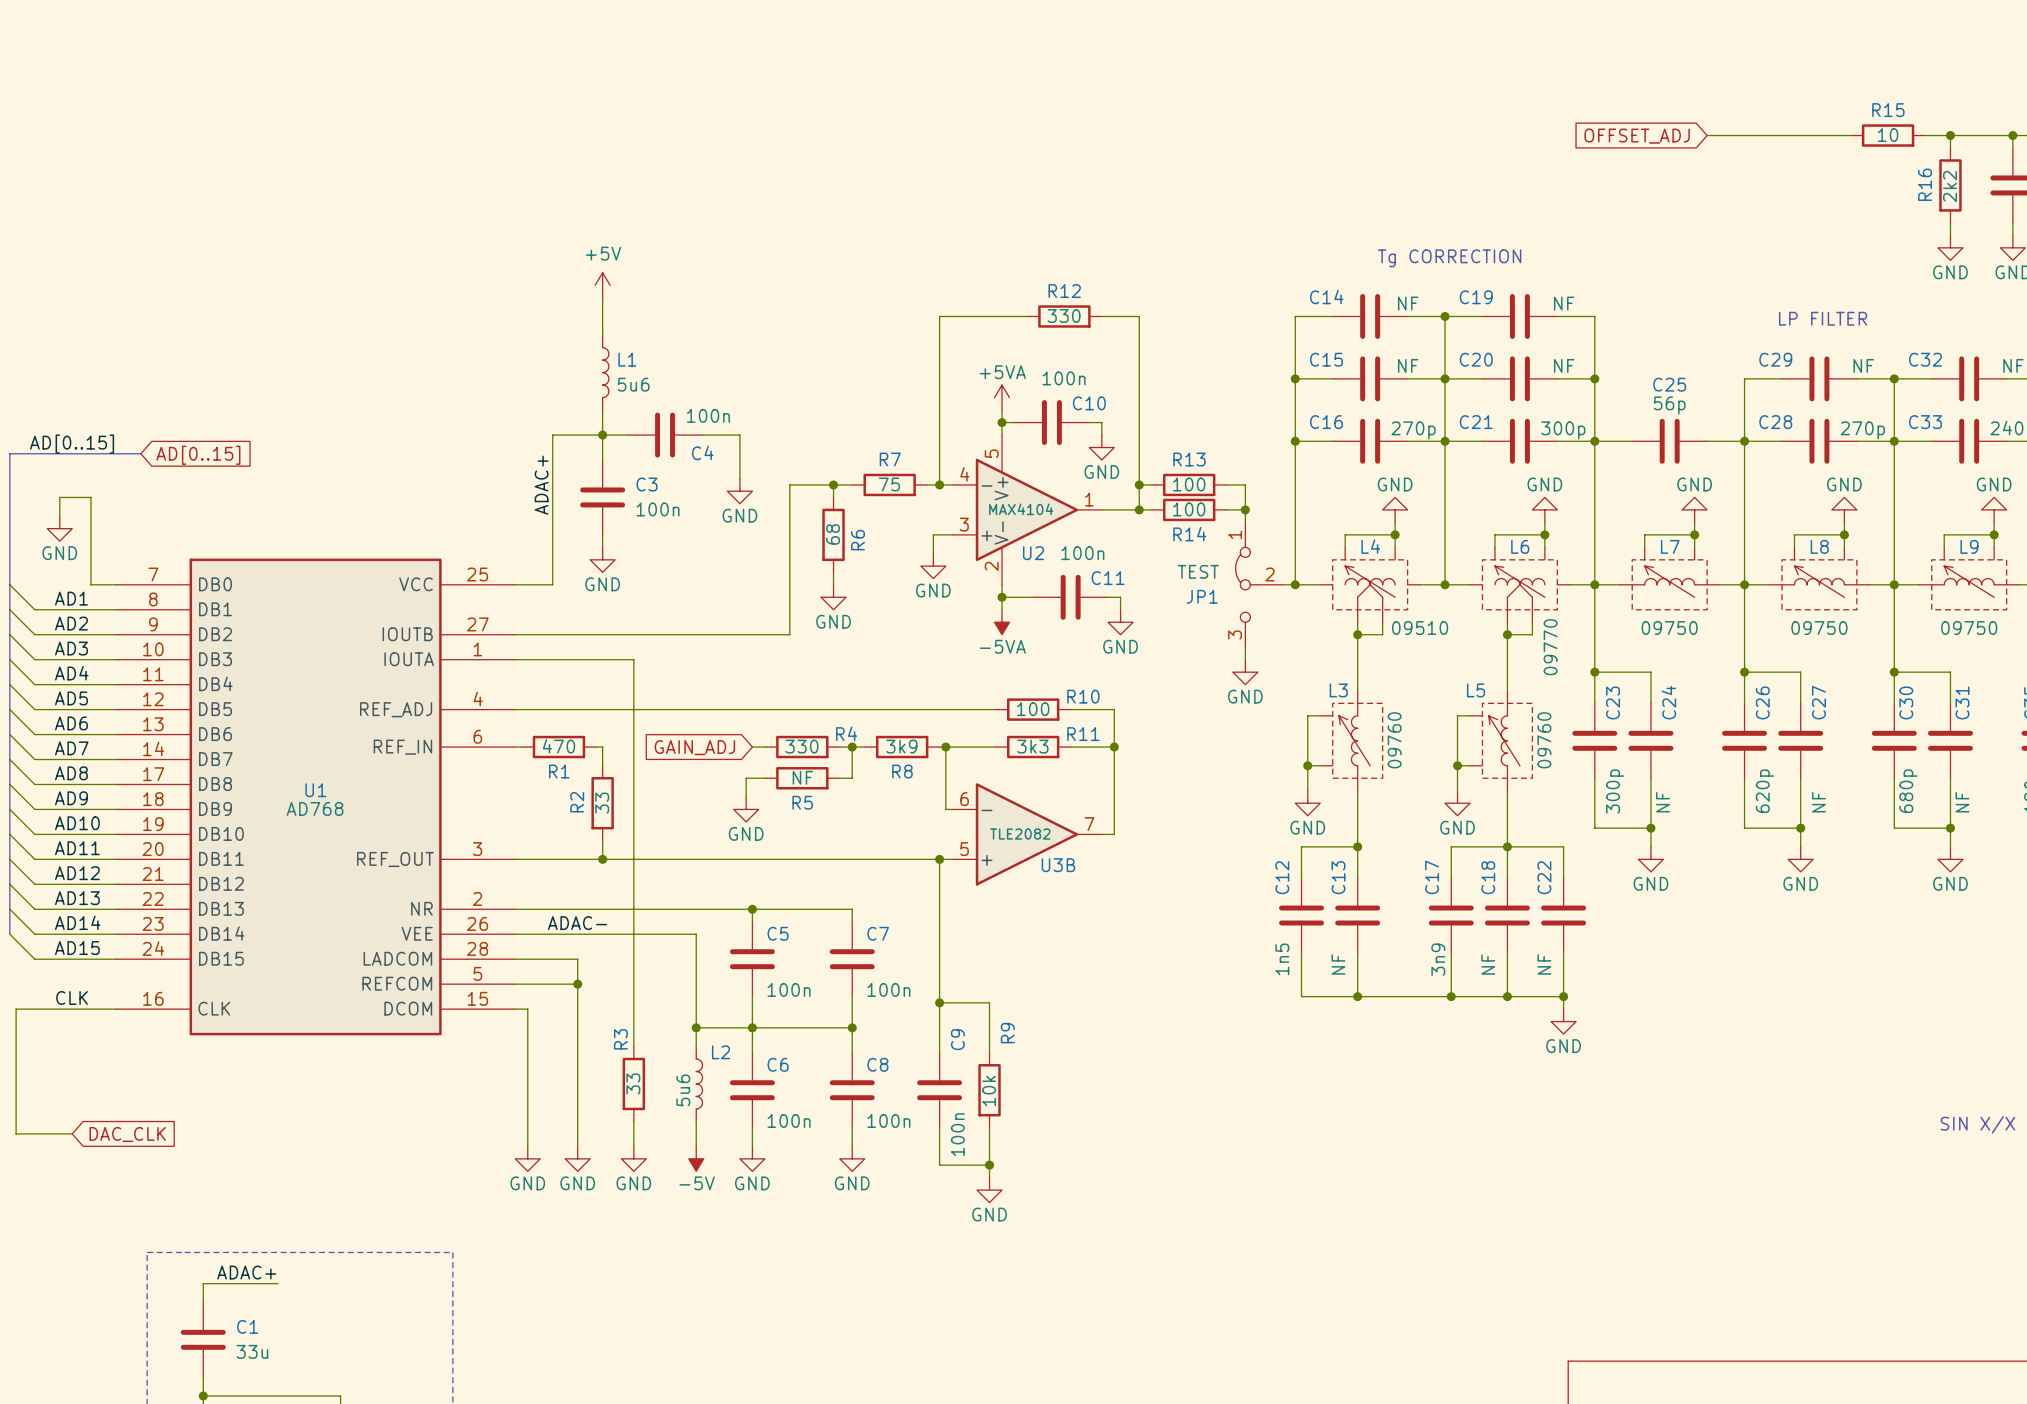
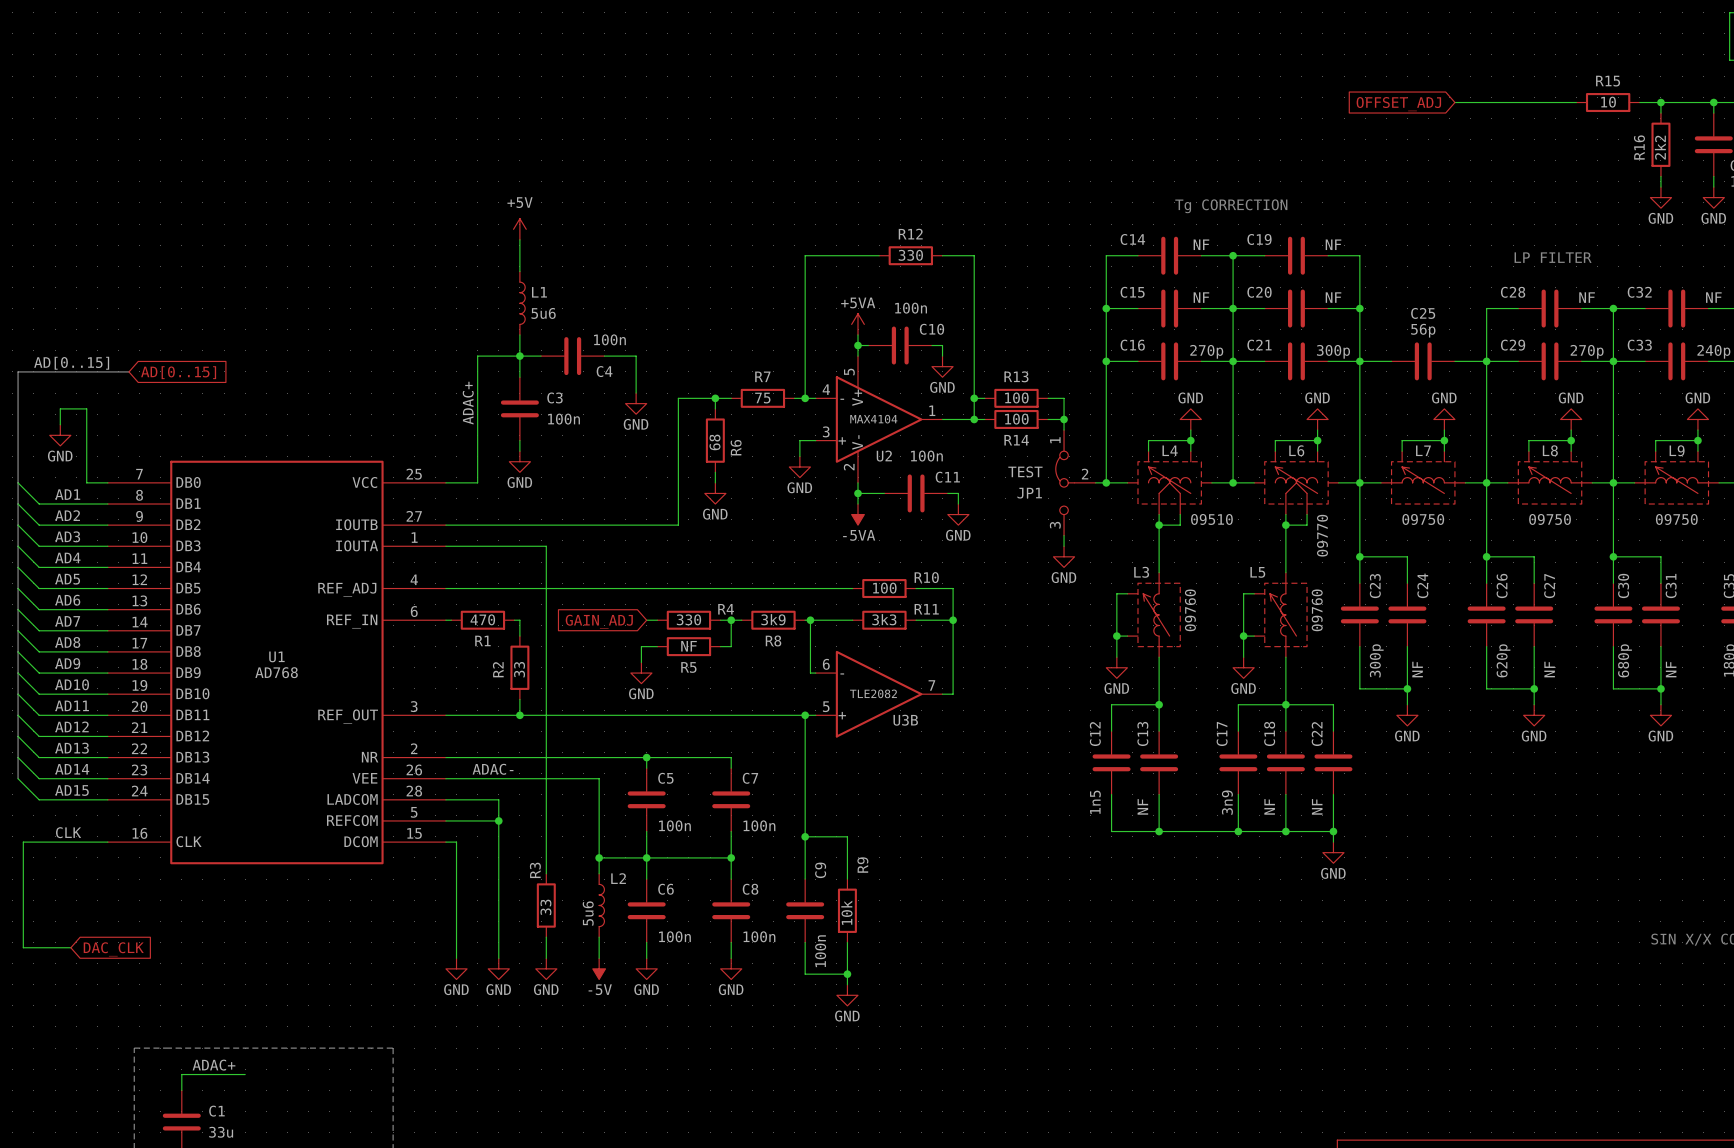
C29 name: C29 (1775, 359) -> C28 (1513, 292)
C28 name: C28 (1775, 422) -> C29 (1513, 345)

